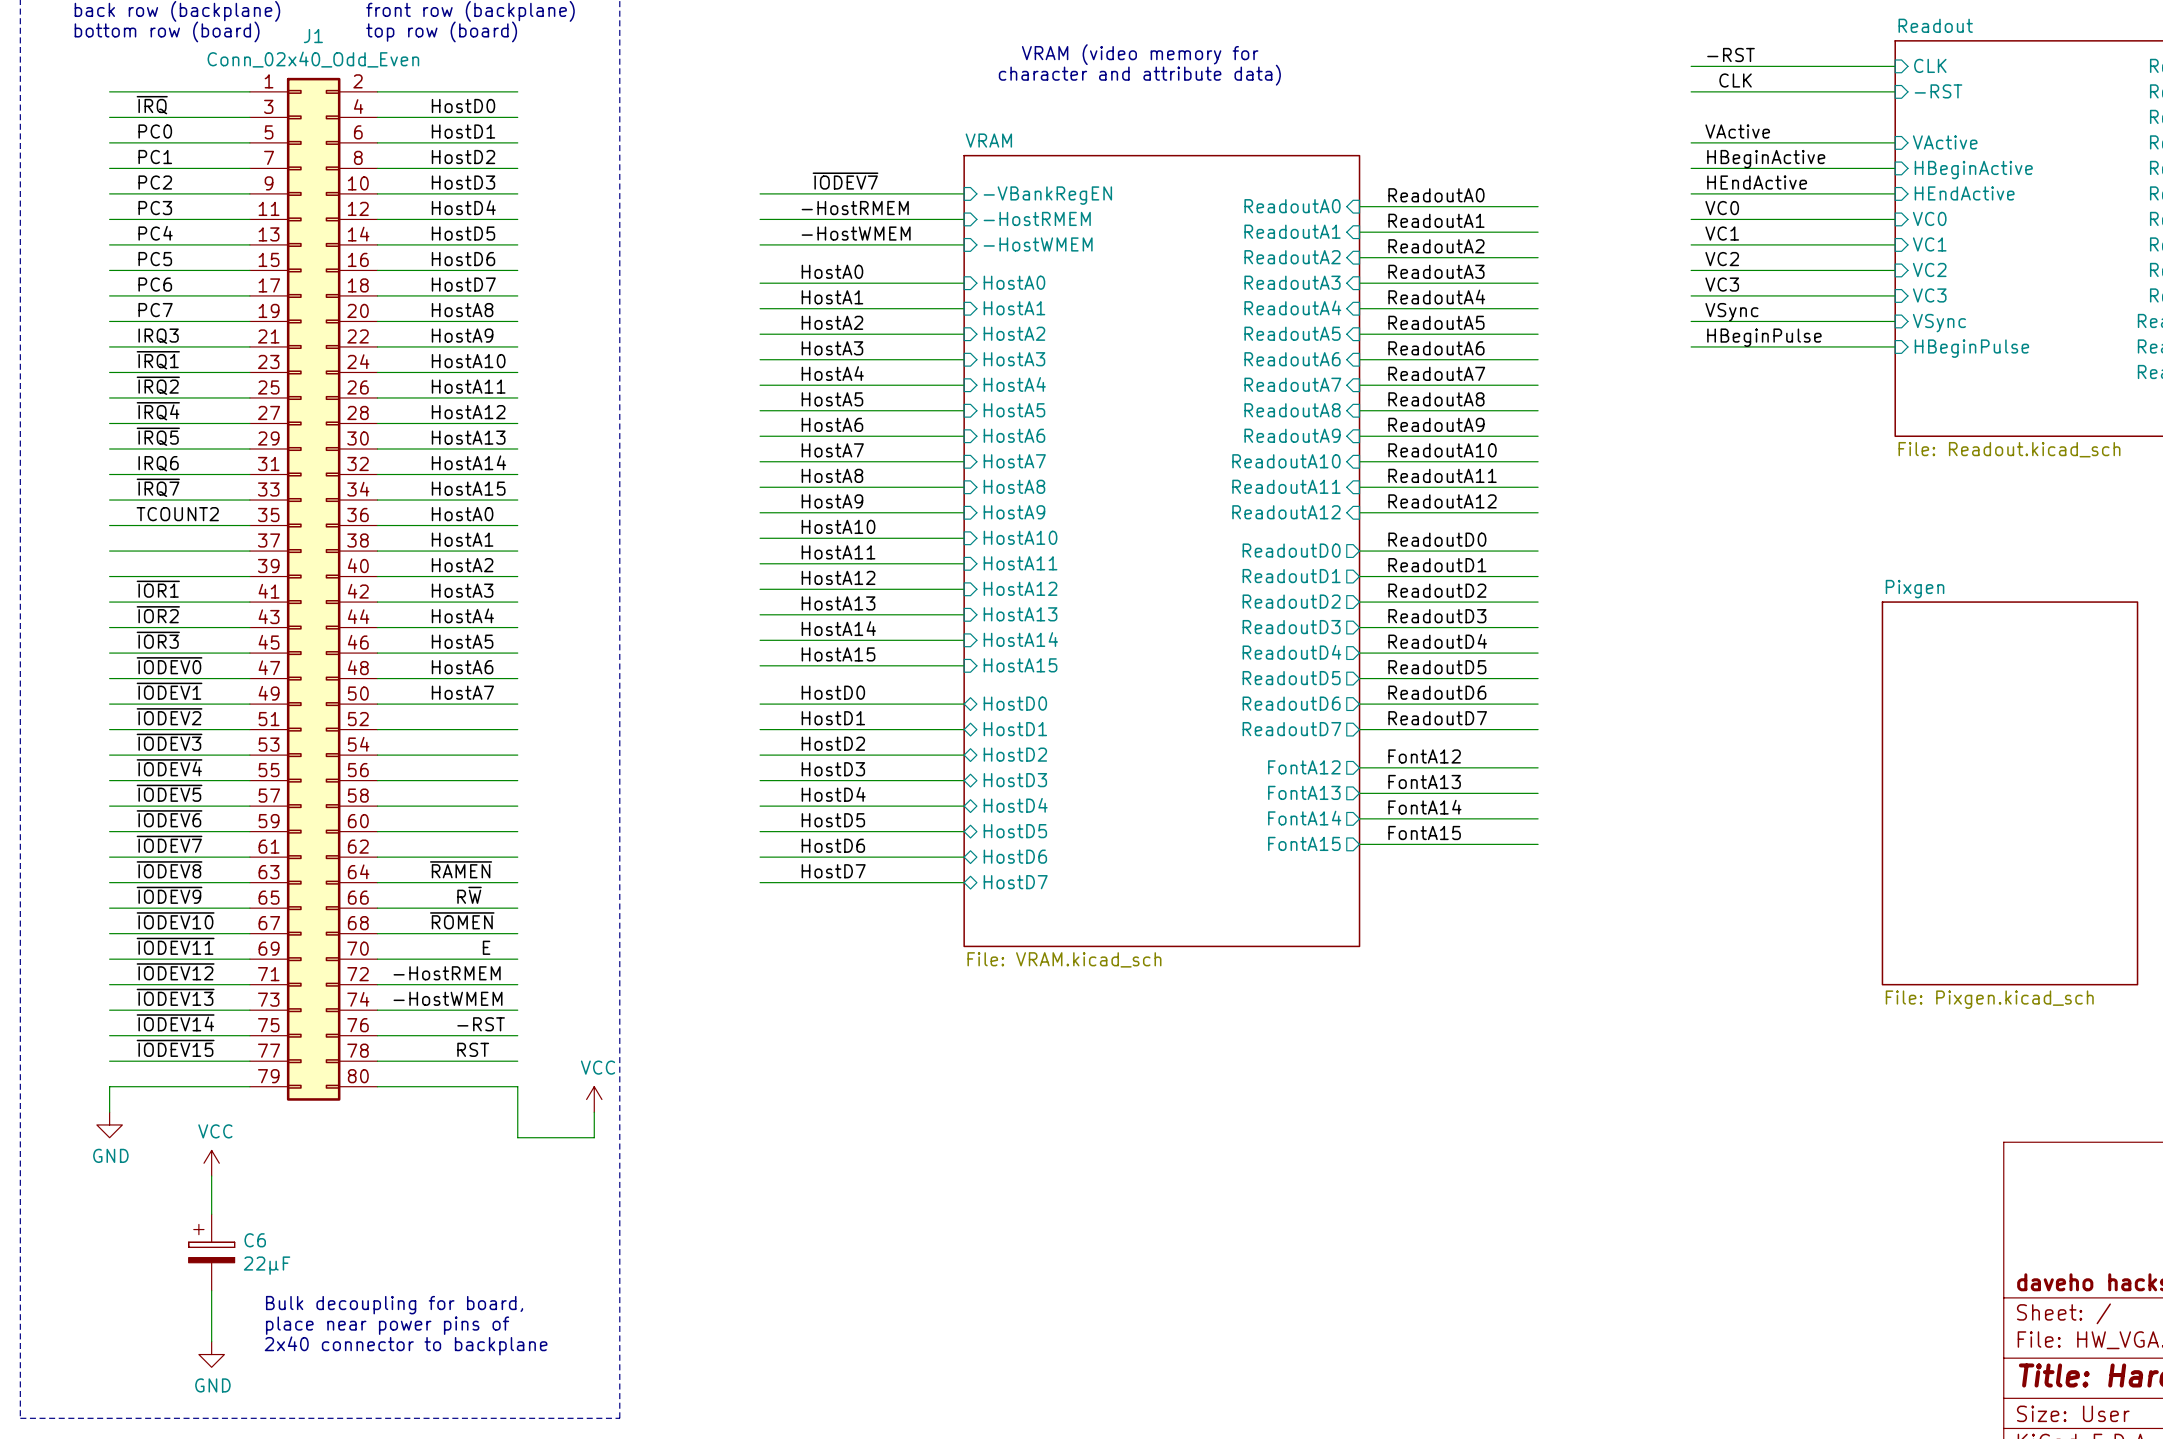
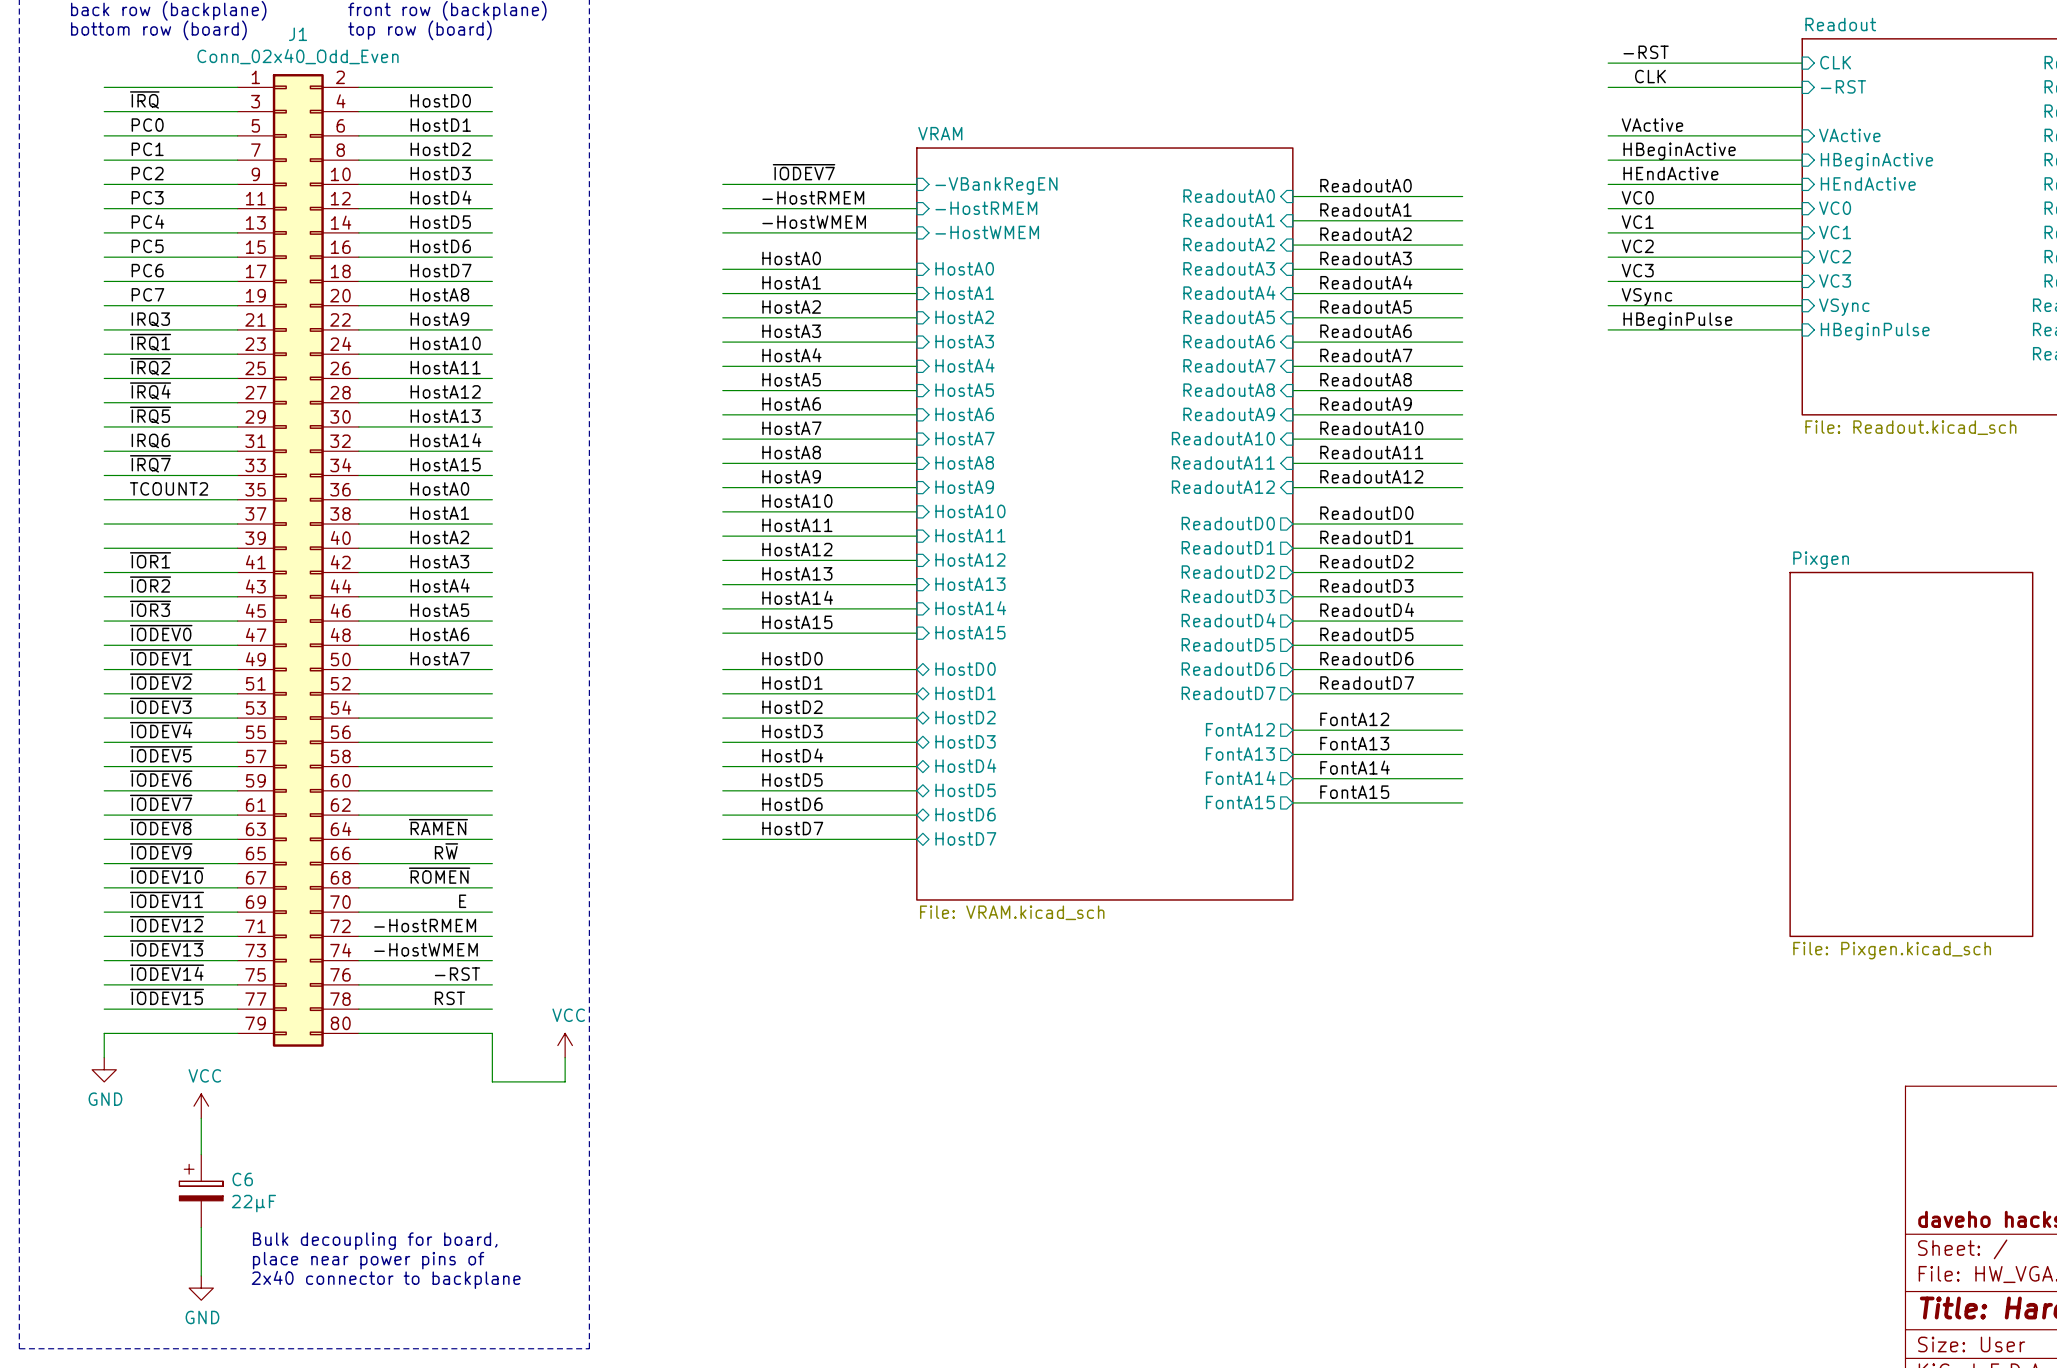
text: VRAM (video memory for (1140, 54) -> none
text: character and attribute data) (1139, 75) -> none

